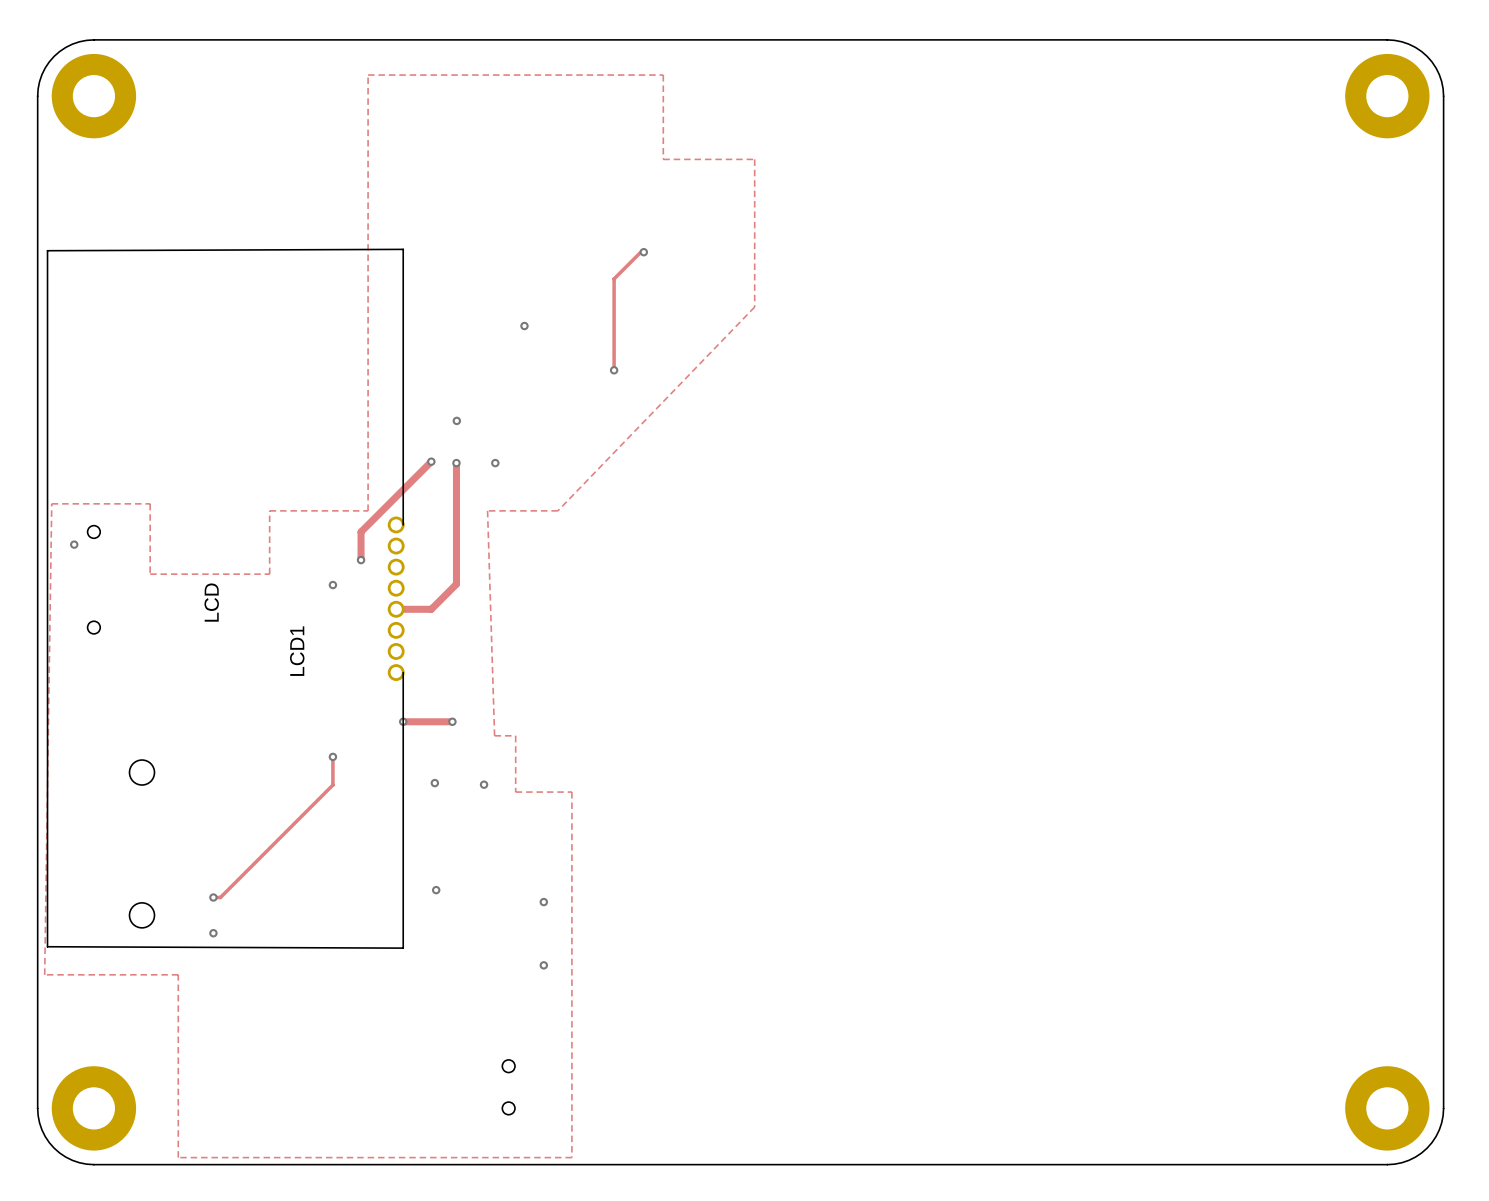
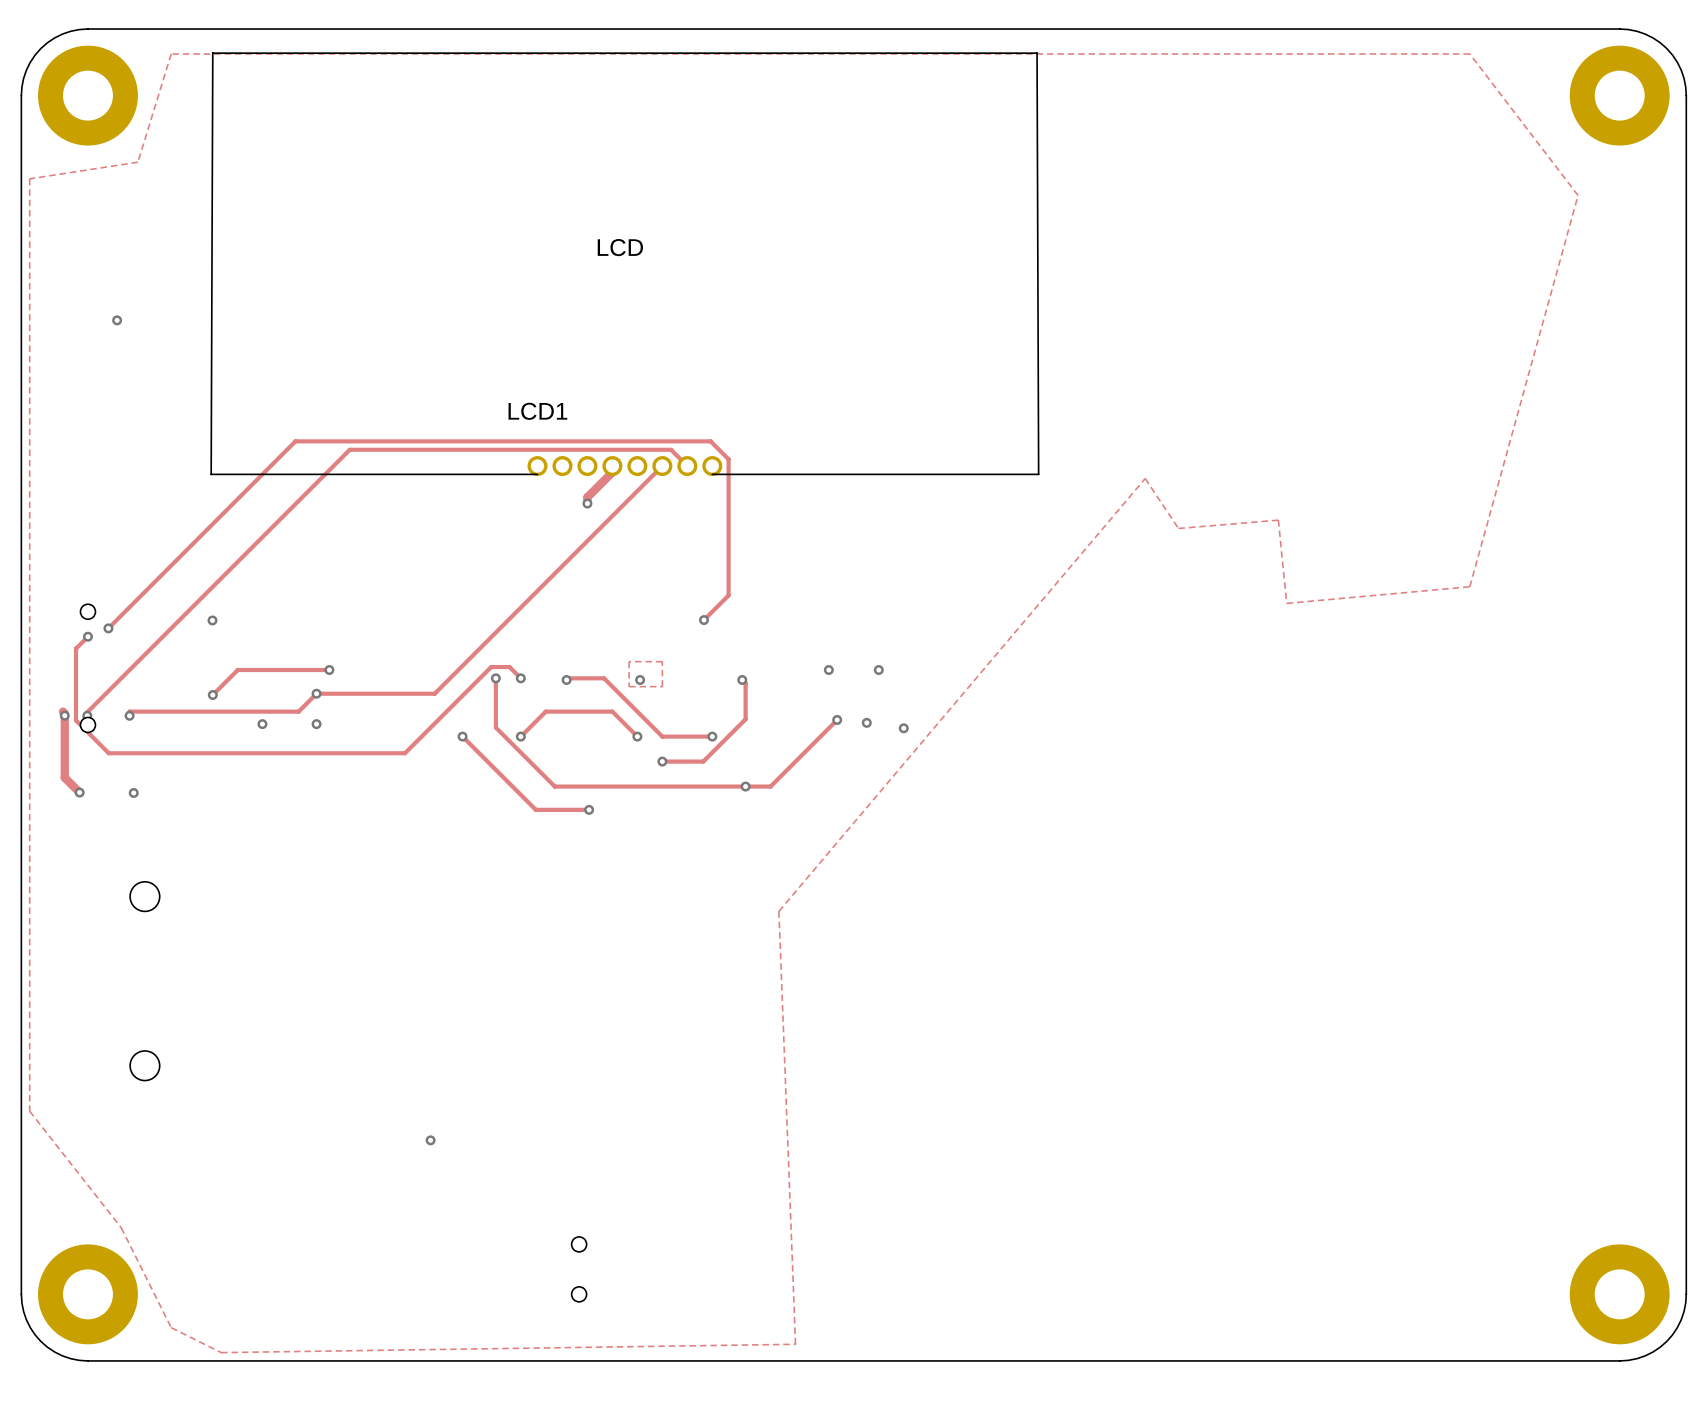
zone outline: (368, 75) (368, 510) (269, 510) (269, 574) (150, 574) (150, 503) (51, 503) (44, 974) (178, 974) (178, 1157) (571, 1157) (571, 792) (515, 792) (515, 735) (494, 735) (487, 510) (557, 510) (754, 307) (754, 159) (663, 159) (663, 75) (368, 75) -> (171, 53) (137, 162) (29, 178) (29, 1111) (121, 1227) (171, 1327) (221, 1352) (795, 1344) (778, 911) (1145, 478) (1178, 528) (1278, 520) (1286, 603) (1469, 586) (1578, 195) (1469, 53) (171, 53)
track: (643, 252) (642, 250) (614, 278) (614, 370) -> none
via: (643, 252) -> none
via: none -> (117, 320)
via: (524, 326) -> none
via: (614, 370) -> none
track: none -> (612, 466) (612, 472) (587, 497) (587, 503)
track: none -> (662, 466) (434, 693) (316, 693) (298, 711) (129, 711) (129, 715)
track: none -> (687, 466) (671, 449) (349, 449) (87, 712) (87, 715)
via: (456, 420) -> none
track: (431, 461) (361, 531) (361, 560) -> none
via: (431, 461) -> none
track: (456, 463) (456, 584) (431, 609) (396, 609) -> none
via: (456, 463) -> none
via position: (495, 463) -> (587, 503)
via: none -> (212, 620)
track: none -> (703, 620) (728, 595) (728, 459) (710, 441) (295, 441) (108, 628)
via: none -> (703, 620)
via: (74, 544) -> none
via: none -> (108, 628)
track: none -> (87, 636) (76, 648) (76, 720) (108, 753) (404, 753) (491, 667) (509, 667) (520, 678)
via: none -> (87, 636)
via: (361, 560) -> none
zone outline: none -> (629, 661) (662, 661) (662, 686) (629, 686) (629, 661)
track: none -> (329, 670) (237, 670) (212, 694)
via: none -> (329, 670)
via: none -> (828, 670)
via: none -> (878, 670)
via: (332, 585) -> none
track: none -> (495, 678) (495, 727) (554, 786) (770, 786) (837, 719)
via: none -> (495, 678)
via: none -> (520, 678)
track: none -> (566, 679) (568, 678) (604, 678) (662, 736) (712, 736)
via: none -> (566, 679)
via: none -> (640, 679)
track: none -> (742, 679) (745, 683) (745, 719) (703, 761) (662, 761)
via: none -> (742, 679)
LCD1 rotation: 0° (225, 598) -> 90° clockwise (624, 264)
LCD1 position: (225, 598) -> (624, 264)
via: none -> (316, 693)
via: none -> (212, 694)
track: none -> (62, 711) (64, 713) (64, 777) (79, 792)
via: none -> (64, 715)
via: none -> (87, 715)
via: none -> (129, 715)
via: none -> (837, 719)
via: none -> (866, 722)
via: none -> (262, 724)
via: none -> (316, 724)
via: none -> (903, 728)
track: none -> (462, 736) (535, 809) (589, 809)
via: none -> (462, 736)
track: none -> (520, 736) (545, 711) (612, 711) (637, 736)
via: none -> (520, 736)
via: none -> (637, 736)
via: none -> (712, 736)
LCD1 name position: LCD1 (297, 651) -> LCD1 (537, 411)
via: none -> (662, 761)
via: none -> (745, 786)
via: none -> (79, 792)
via: none -> (133, 793)
via: none -> (589, 809)
track: (403, 721) (452, 721) -> none
via: (403, 721) -> none
via: (452, 721) -> none
track: (332, 756) (332, 785) (220, 897) (213, 897) -> none
via: (332, 756) -> none
via: (434, 783) -> none
via: (484, 784) -> none
via: (436, 890) -> none
via: (213, 897) -> none
via: (543, 902) -> none
via: (213, 933) -> none
via: (543, 965) -> none
via: none -> (430, 1140)

